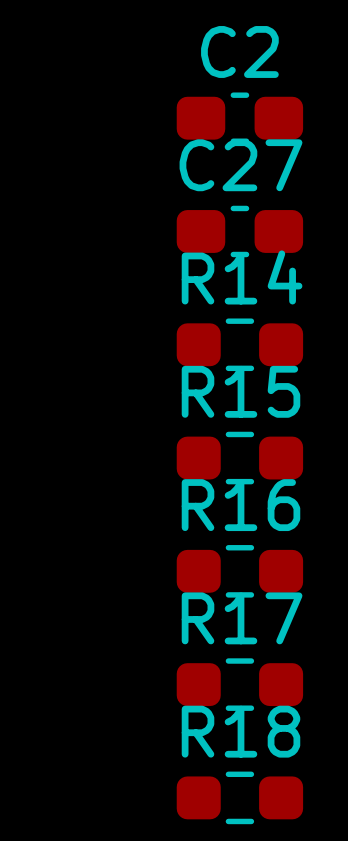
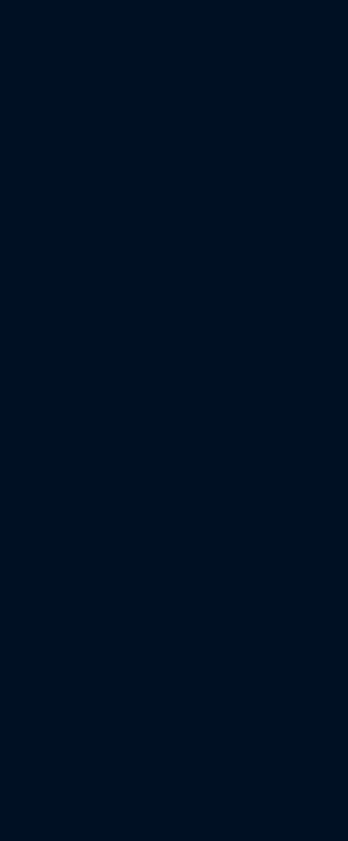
C2: (239, 118) -> none
C27: (239, 231) -> none
R14: (239, 344) -> none
R15: (239, 458) -> none
R16: (239, 571) -> none
R17: (239, 684) -> none
R18: (239, 797) -> none

